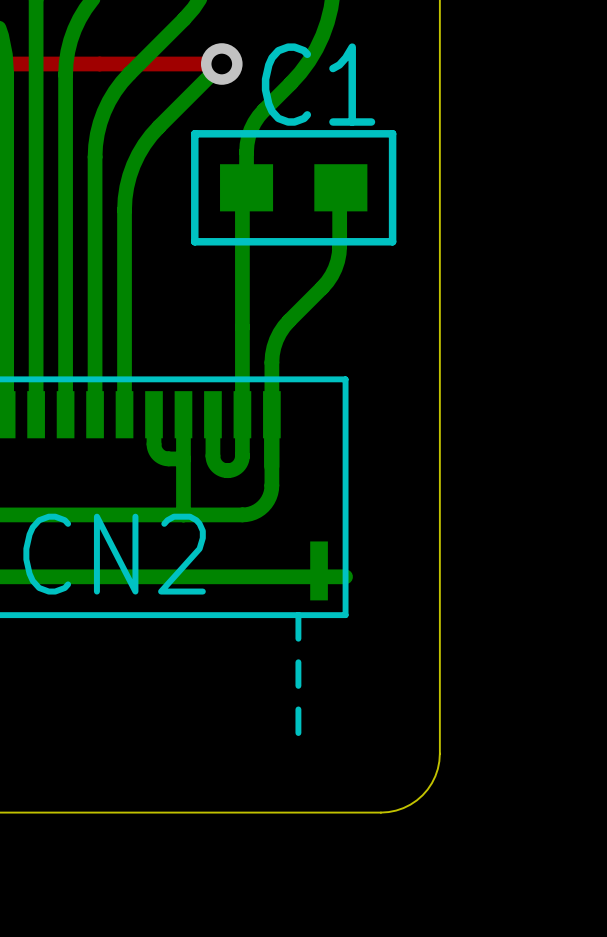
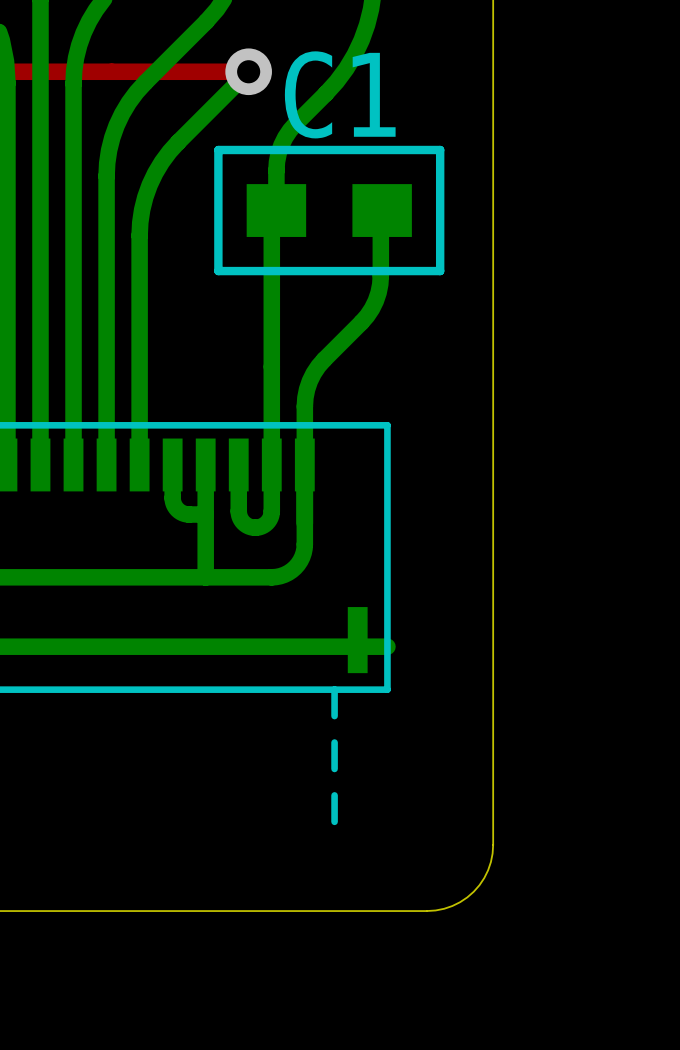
CN2 name: CN2 (114, 554) -> none

